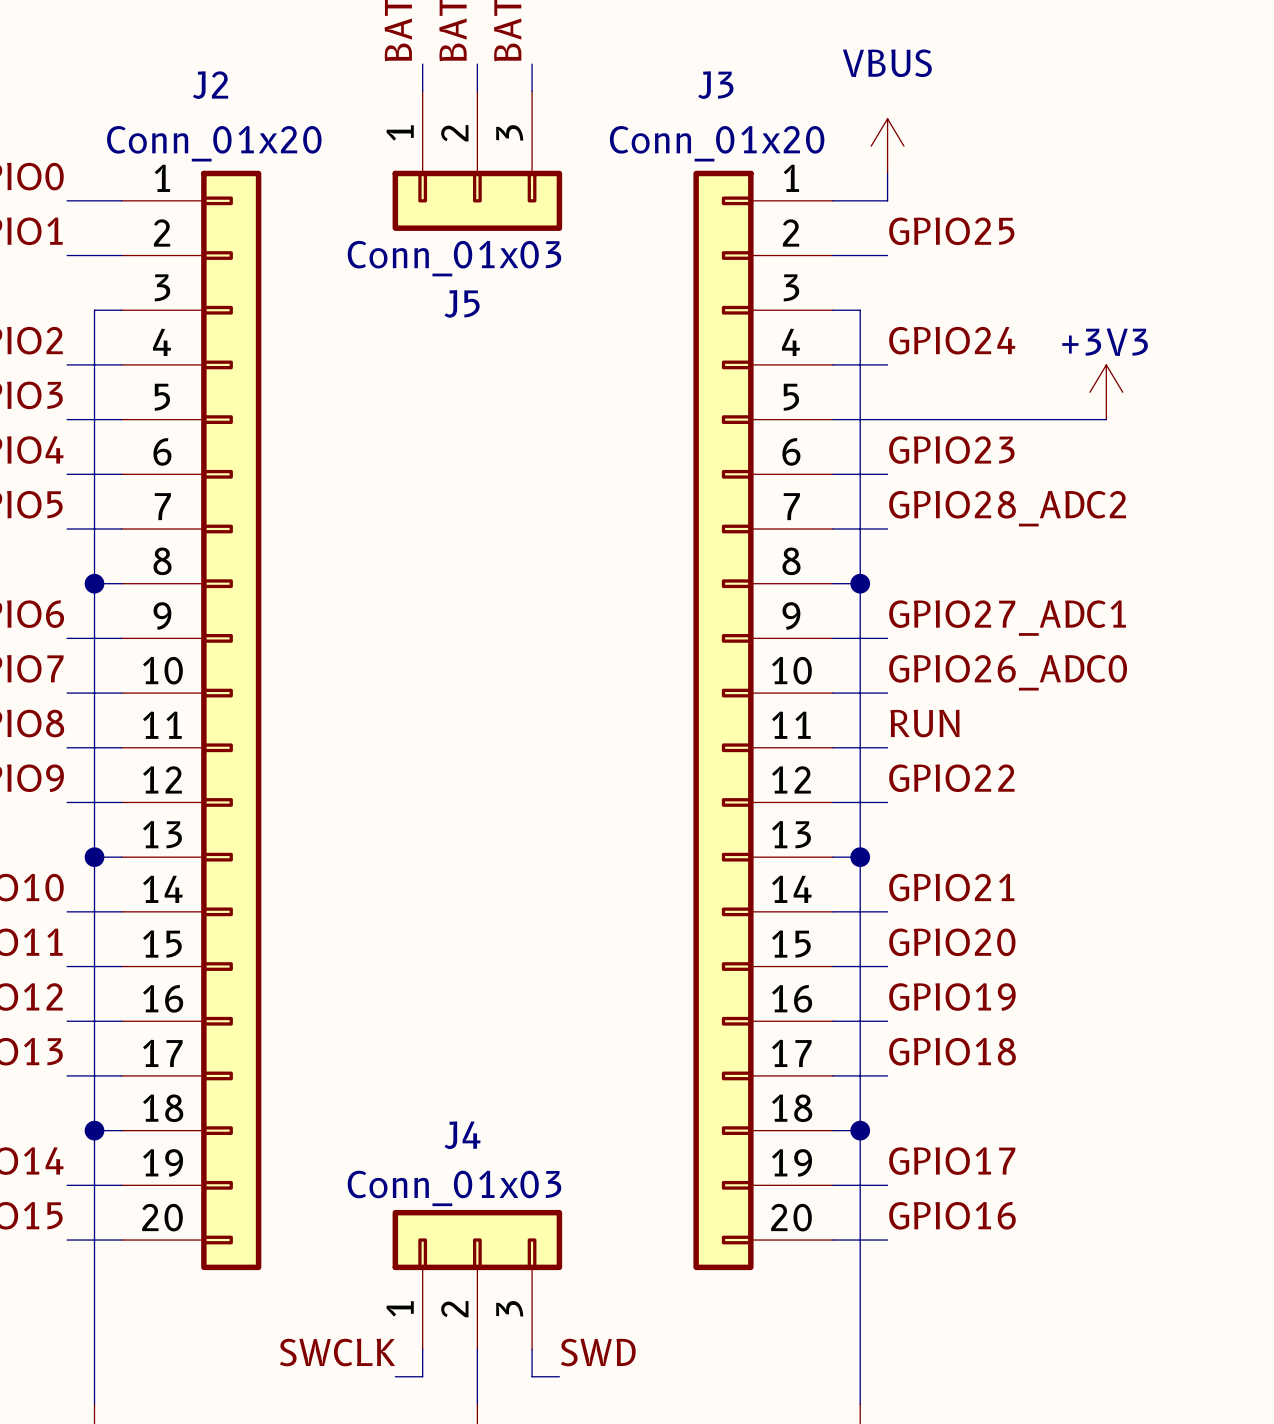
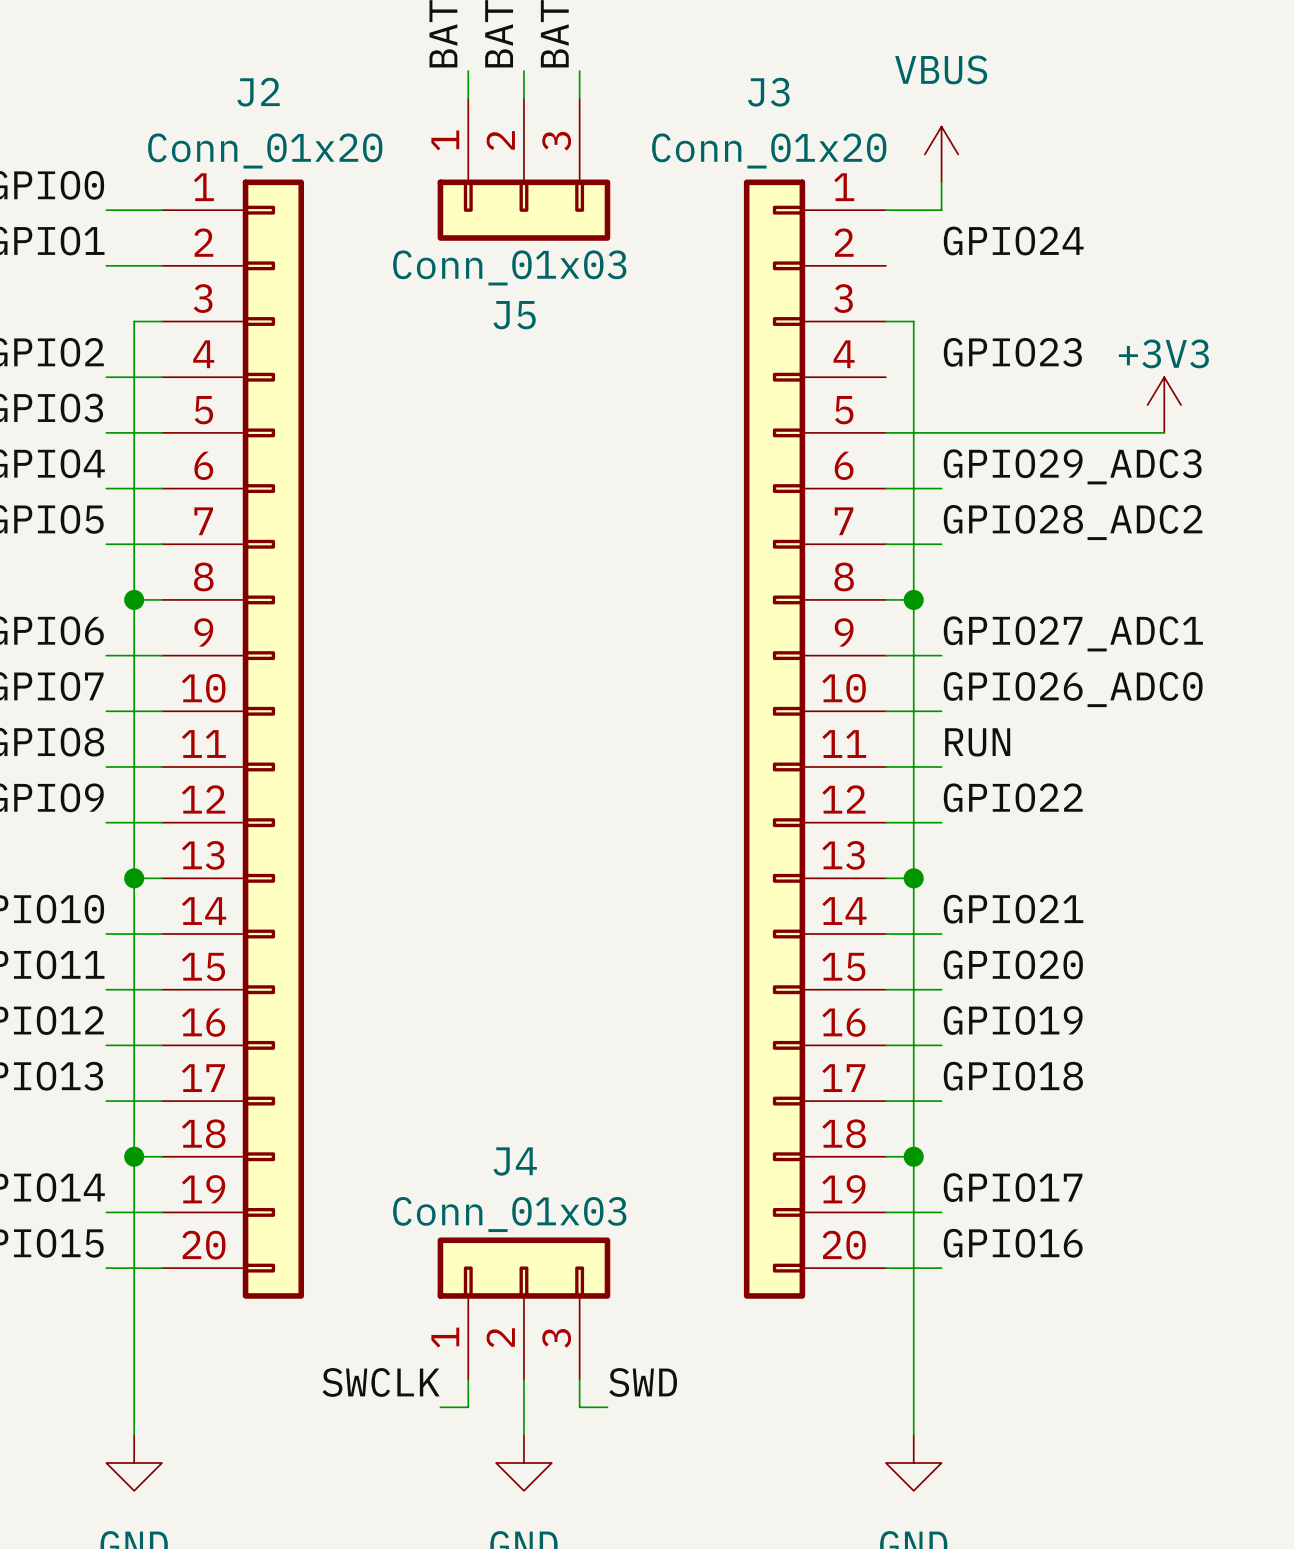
label: GPIO25 (951, 231) -> GPIO24 (1013, 241)
wire: (832, 255) (887, 255) -> none
label: GPIO24 (952, 340) -> GPIO23 (1012, 352)
wire: (832, 364) (887, 364) -> none
label: GPIO23 (951, 450) -> GPIO29_ADC3 (1072, 466)

